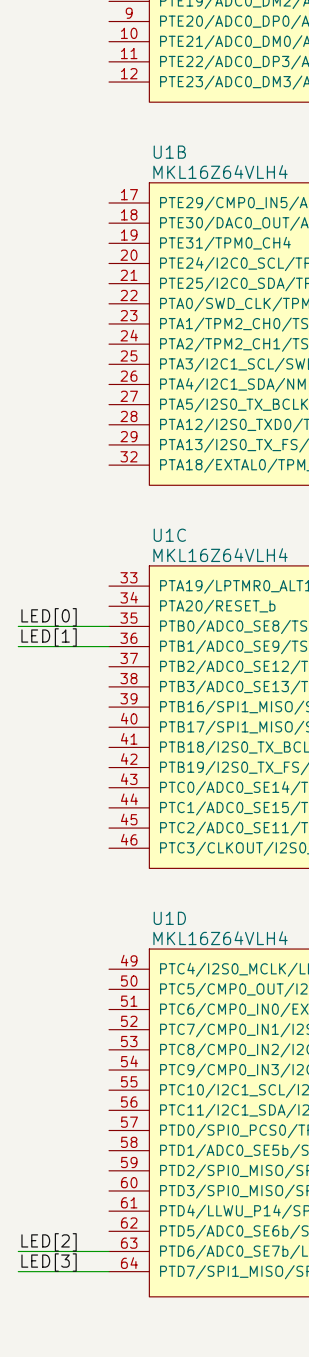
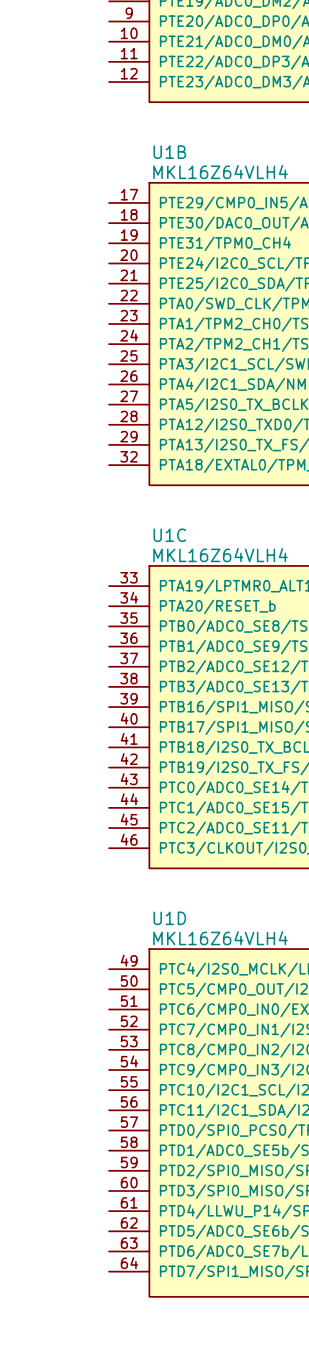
label: LED[0] (49, 617) -> none
wire: (18, 626) (109, 626) -> none
label: LED[1] (49, 637) -> none
wire: (18, 646) (109, 646) -> none
label: LED[2] (49, 1242) -> none
wire: (18, 1251) (109, 1251) -> none
label: LED[3] (49, 1262) -> none
wire: (18, 1271) (109, 1271) -> none

